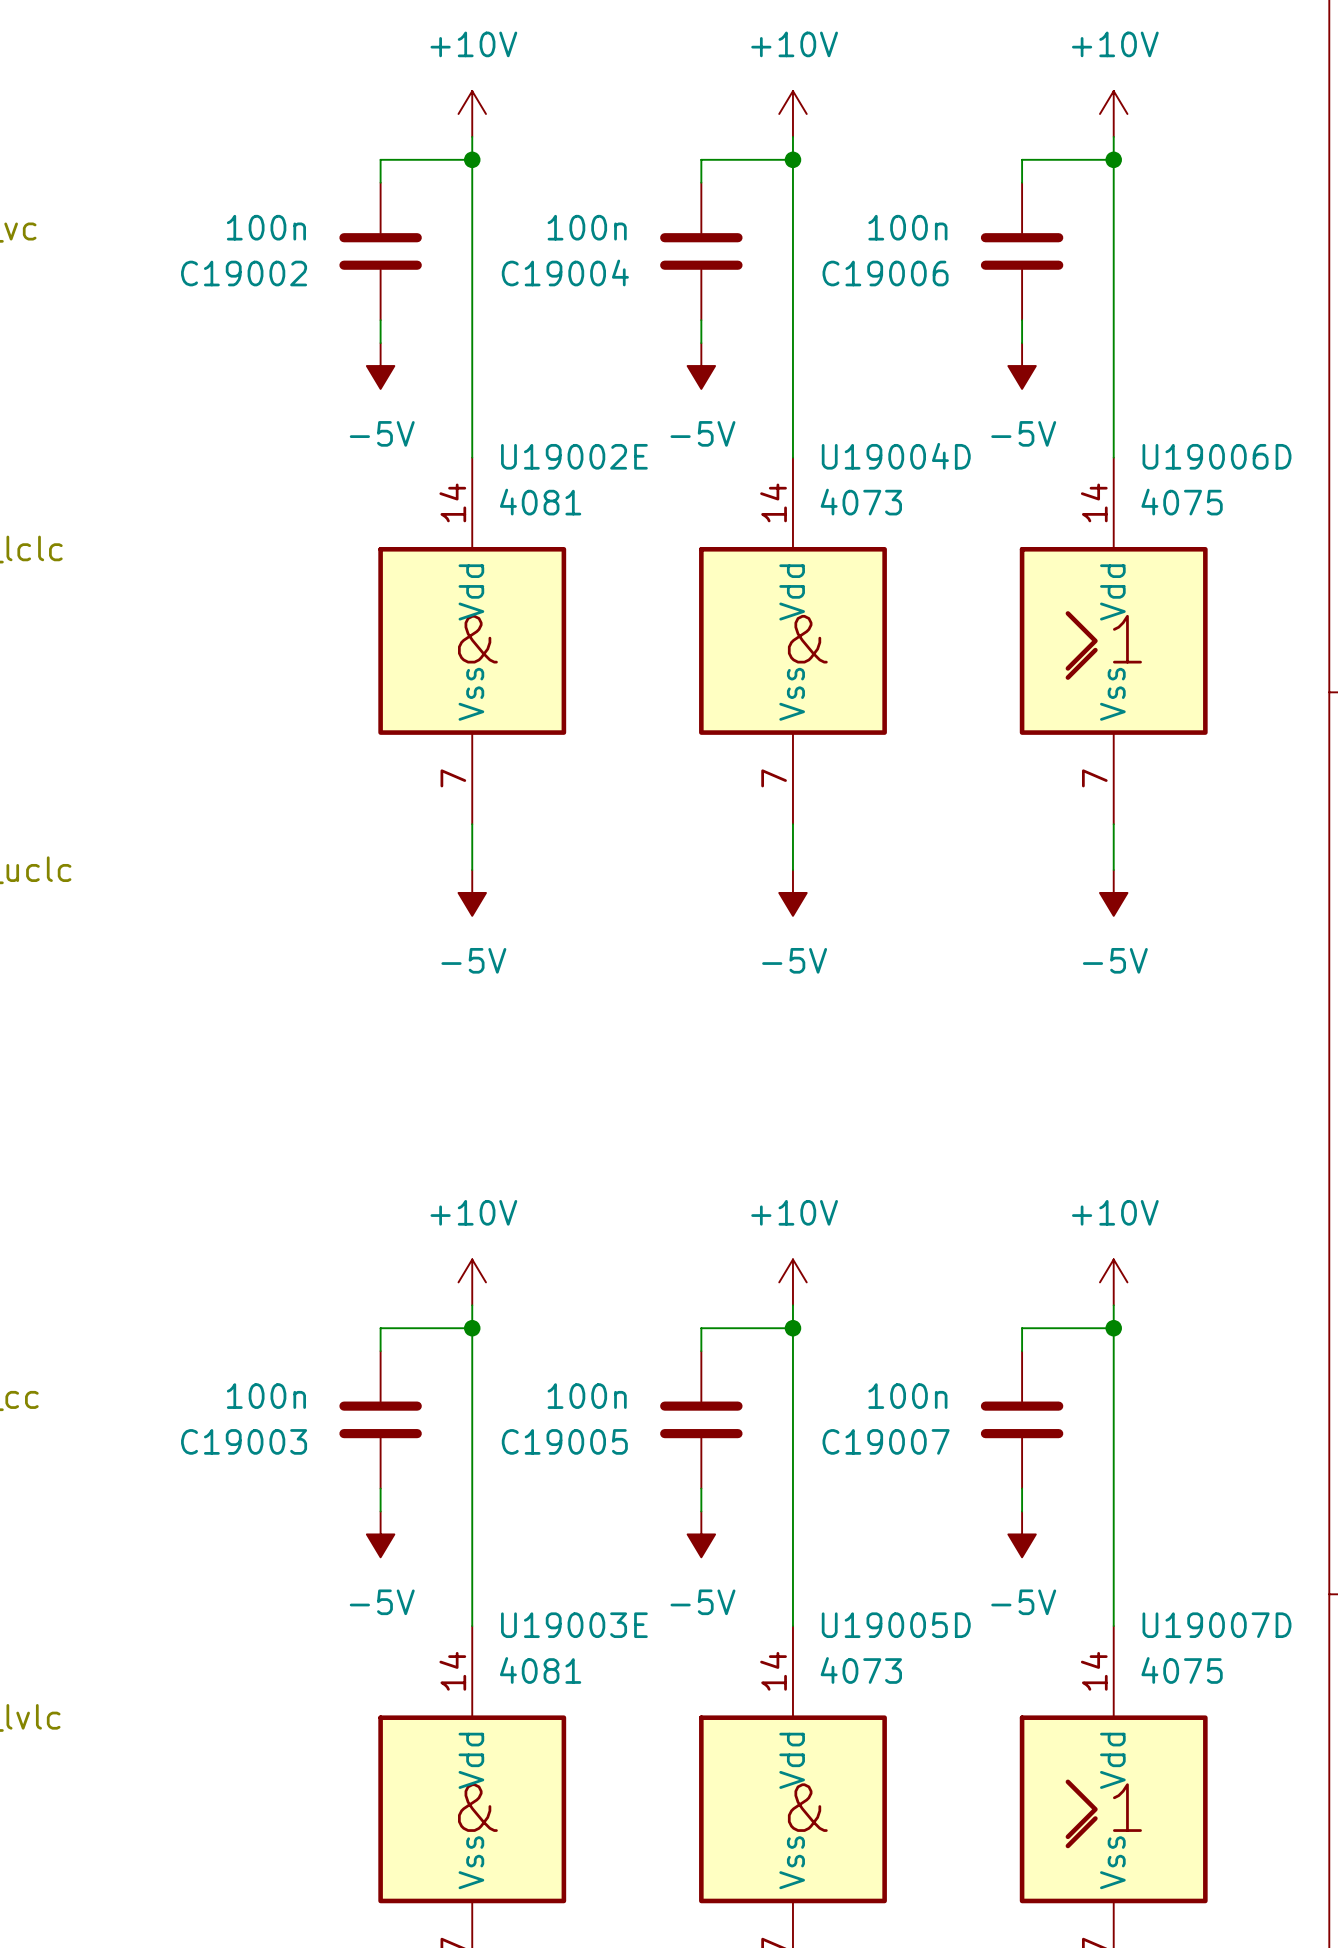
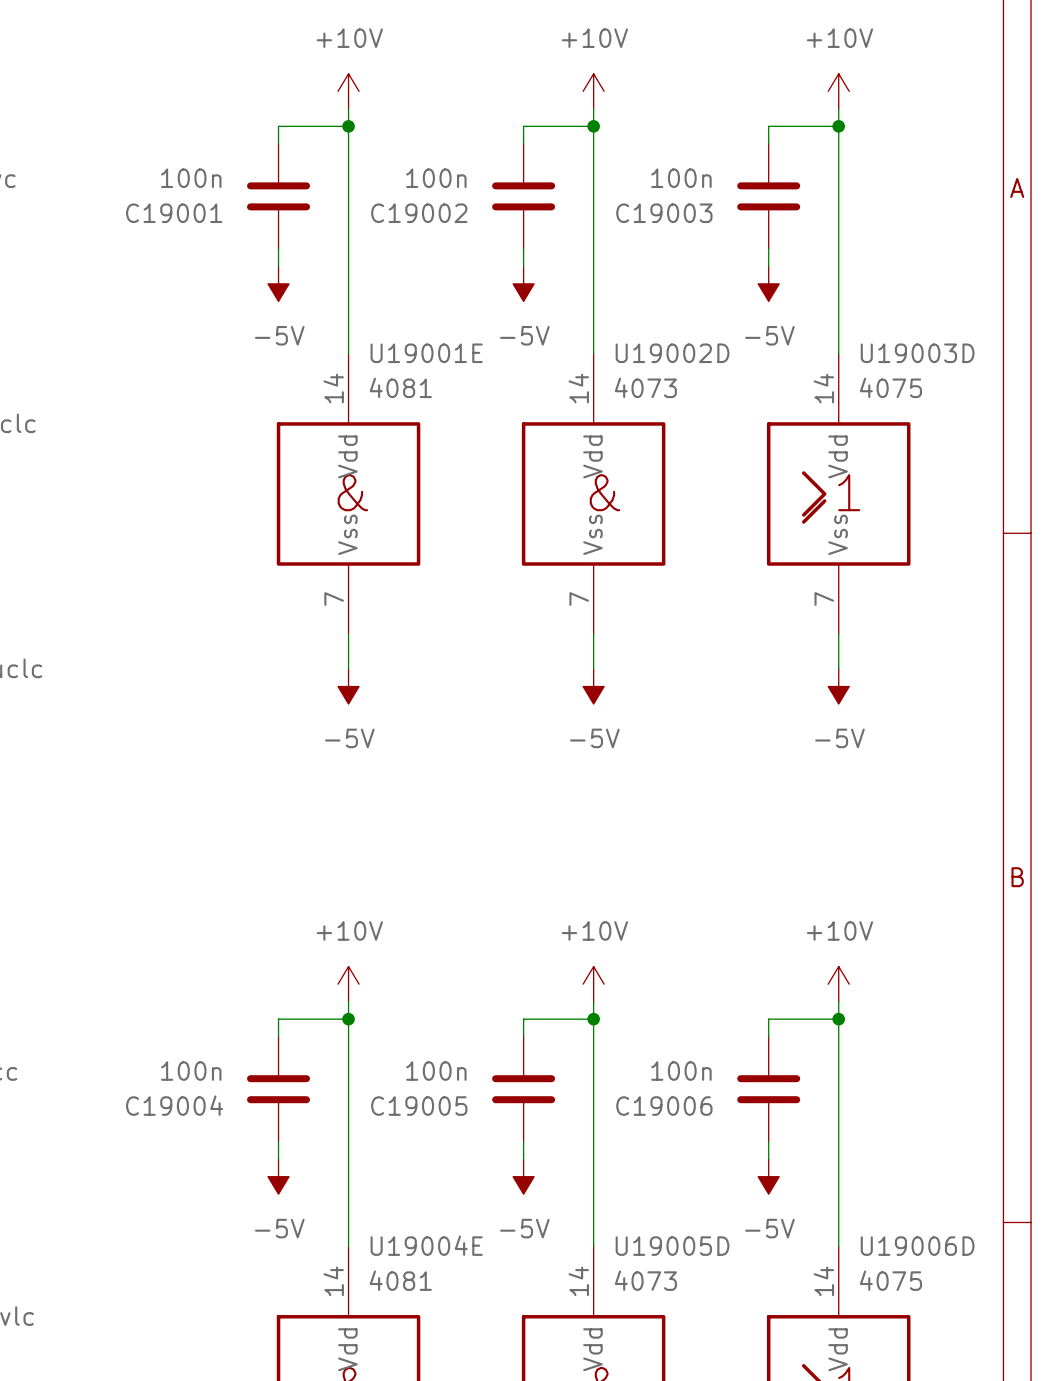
C19004 name: C19004 (565, 272) -> C19002 (419, 213)
C19002 name: C19002 (244, 273) -> C19001 (174, 213)
C19006 name: C19006 (885, 273) -> C19003 (664, 213)
U19002E name: U19002E (574, 456) -> U19001E (426, 353)
U19004D name: U19004D (896, 456) -> U19002D (672, 353)
U19006D name: U19006D (1216, 456) -> U19003D (917, 353)
C19003 name: C19003 (244, 1441) -> C19004 (174, 1105)
C19007 name: C19007 (886, 1441) -> C19006 (664, 1106)
U19003E name: U19003E (574, 1625) -> U19004E (426, 1245)
U19007D name: U19007D (1216, 1625) -> U19006D (917, 1246)

